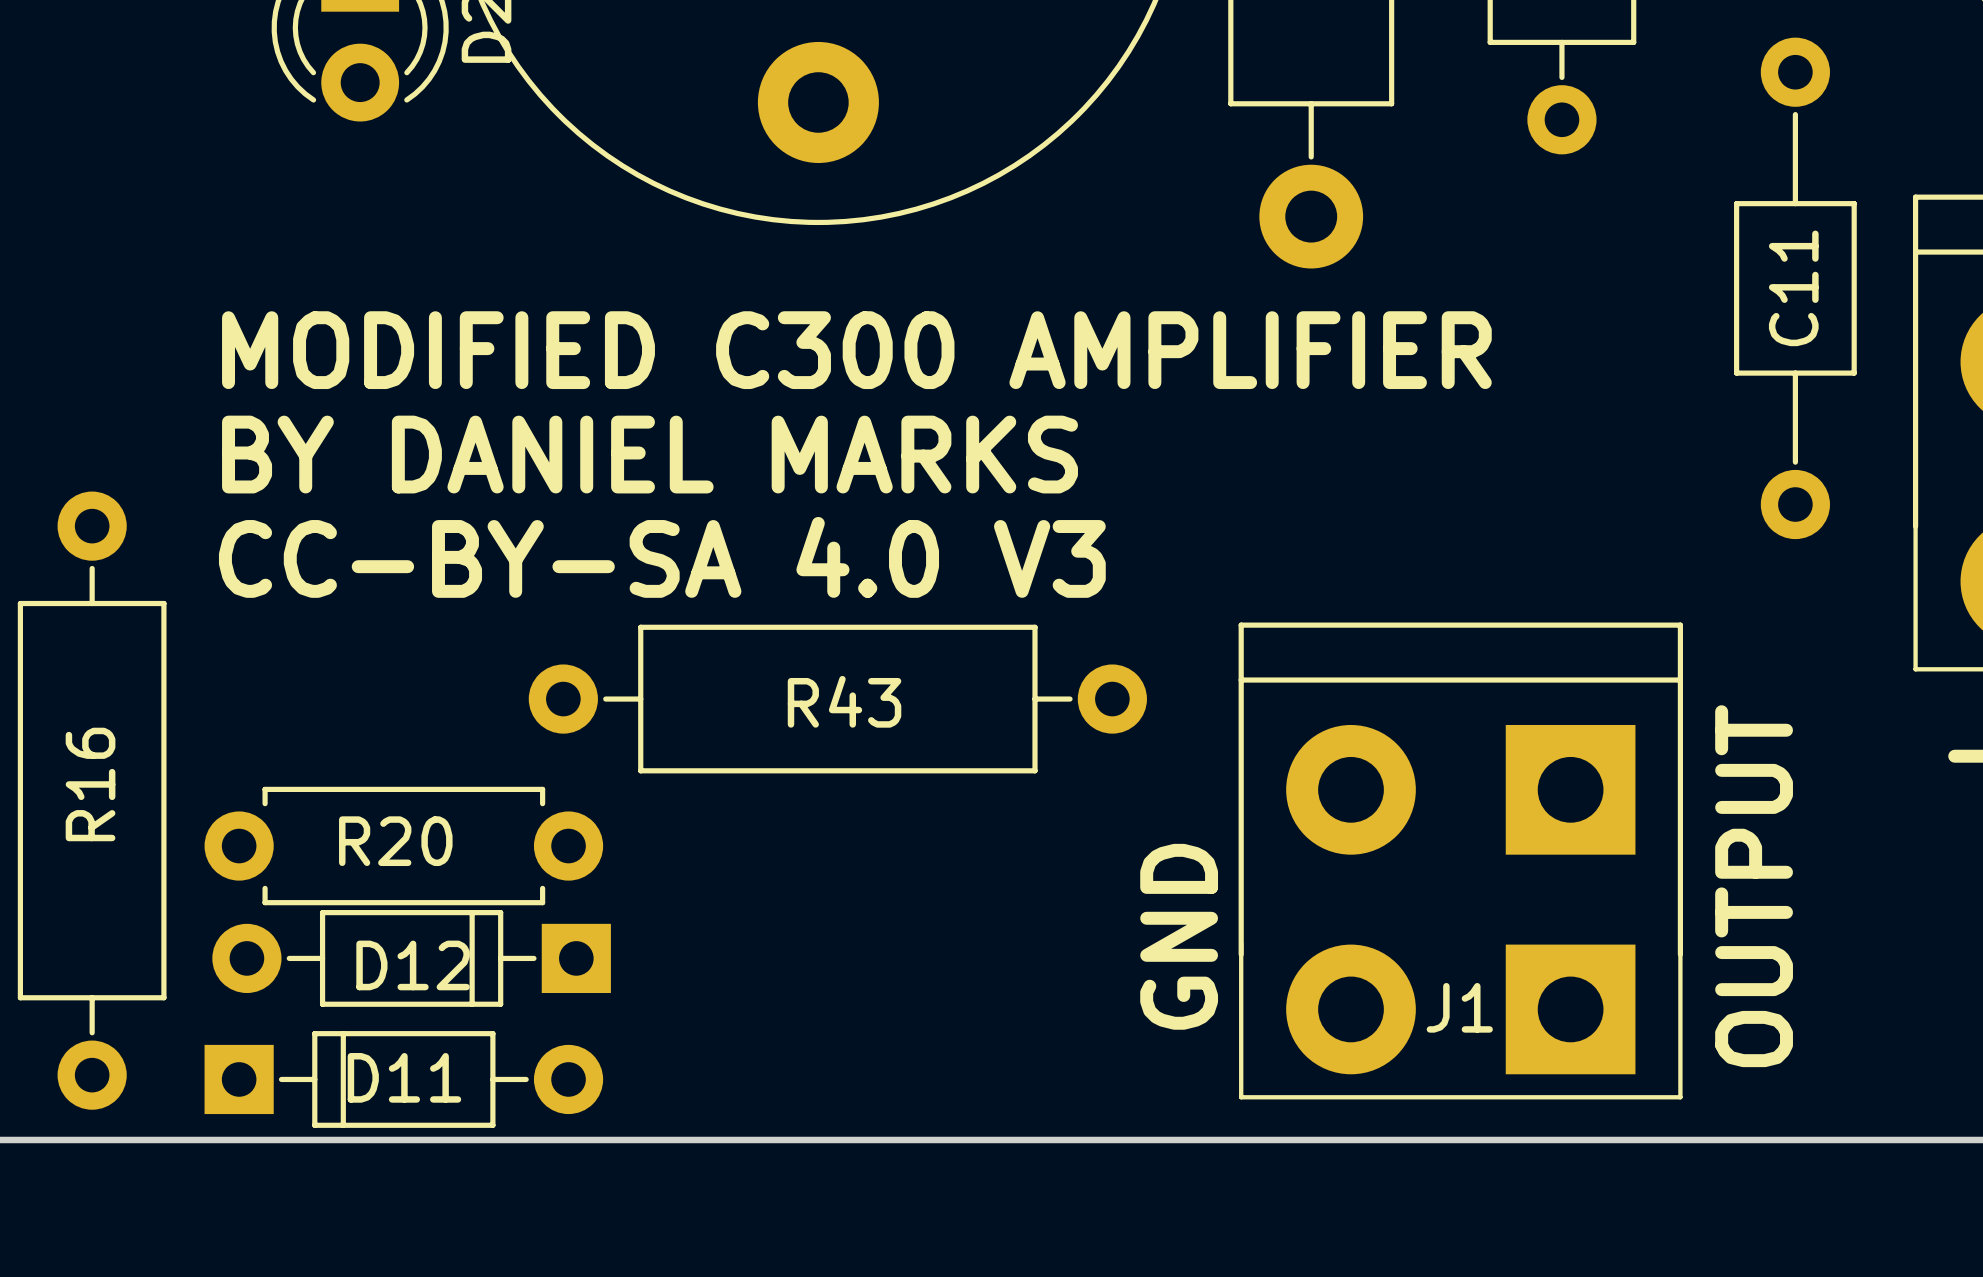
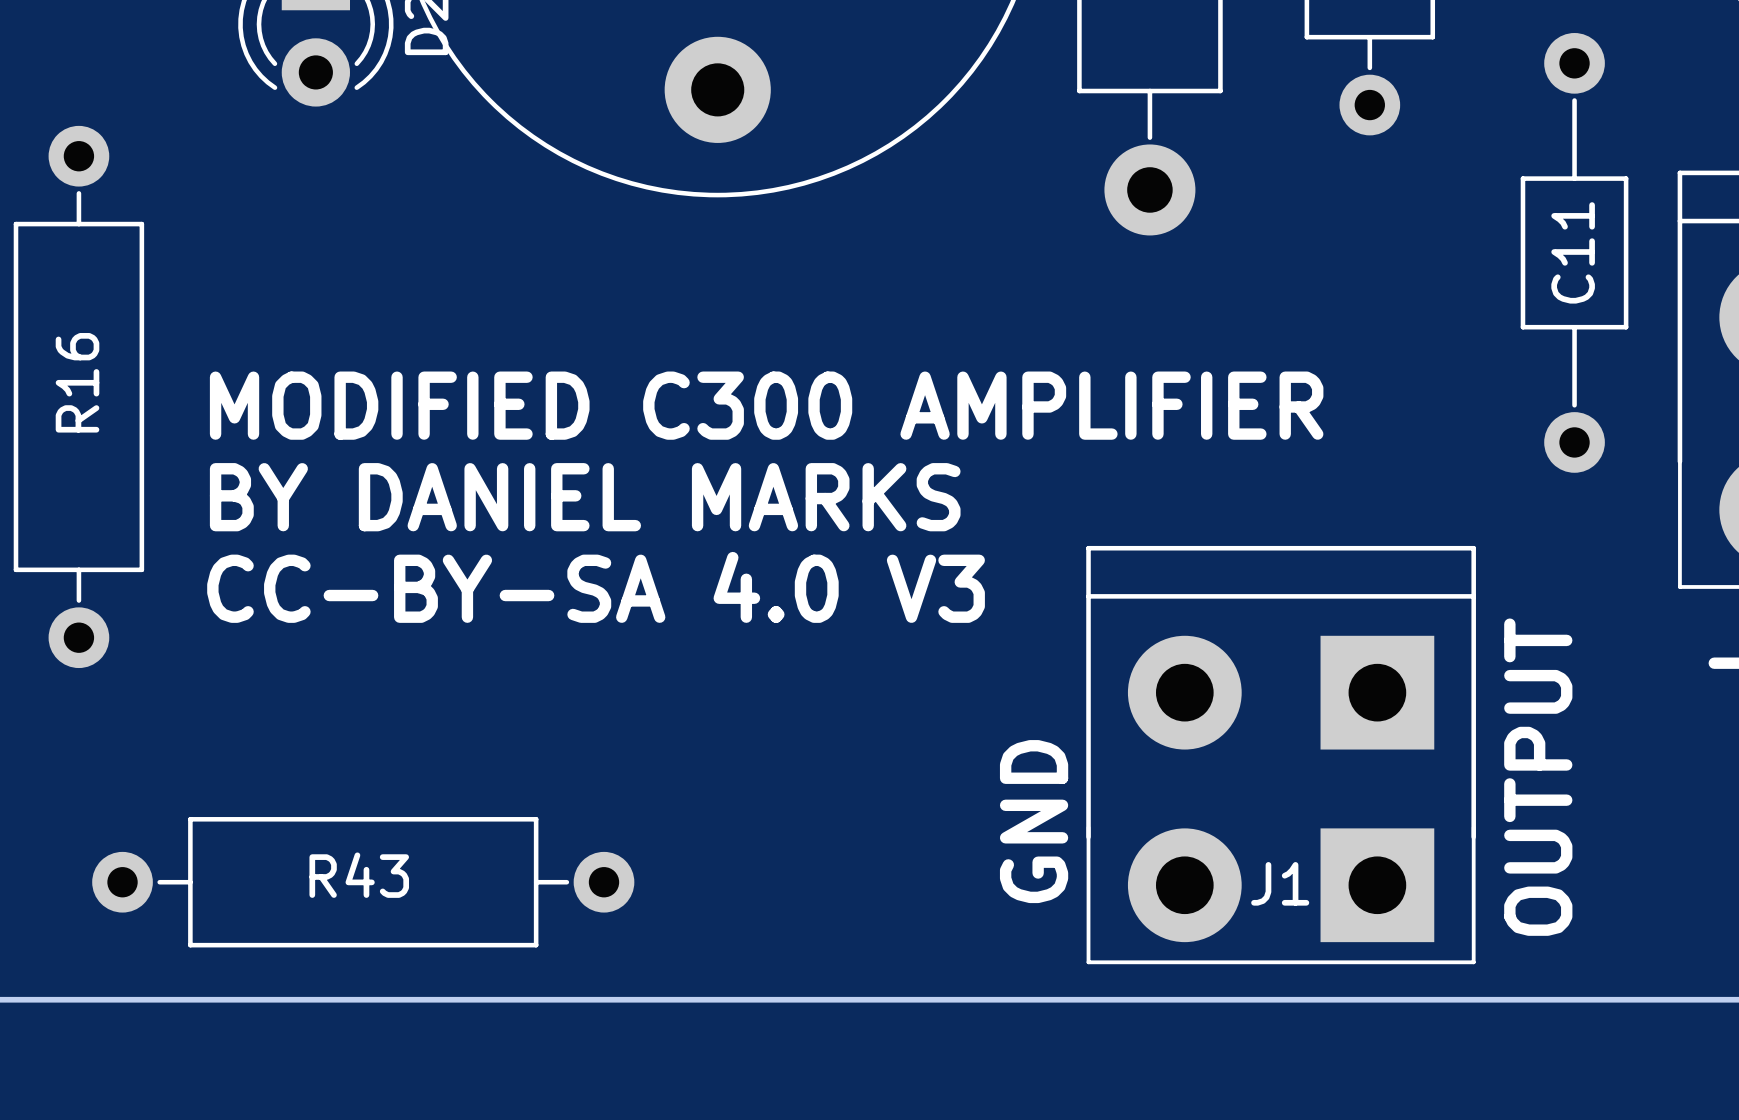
text position: MODIFIED C300 AMPLIFIER (856, 350) -> MODIFIED C300 AMPLIFIER (766, 405)
text position: BY DANIEL MARKS (650, 454) -> BY DANIEL MARKS (585, 497)
text position: CC-BY-SA 4.0 V3 (662, 557) -> CC-BY-SA 4.0 V3 (596, 587)
R43 position: (837, 699) -> (363, 882)
R43 name position: R43 (844, 701) -> R43 (359, 875)
R16 position: (92, 800) -> (78, 396)
R20: (403, 846) -> none
D12: (411, 958) -> none
D11: (403, 1079) -> none

